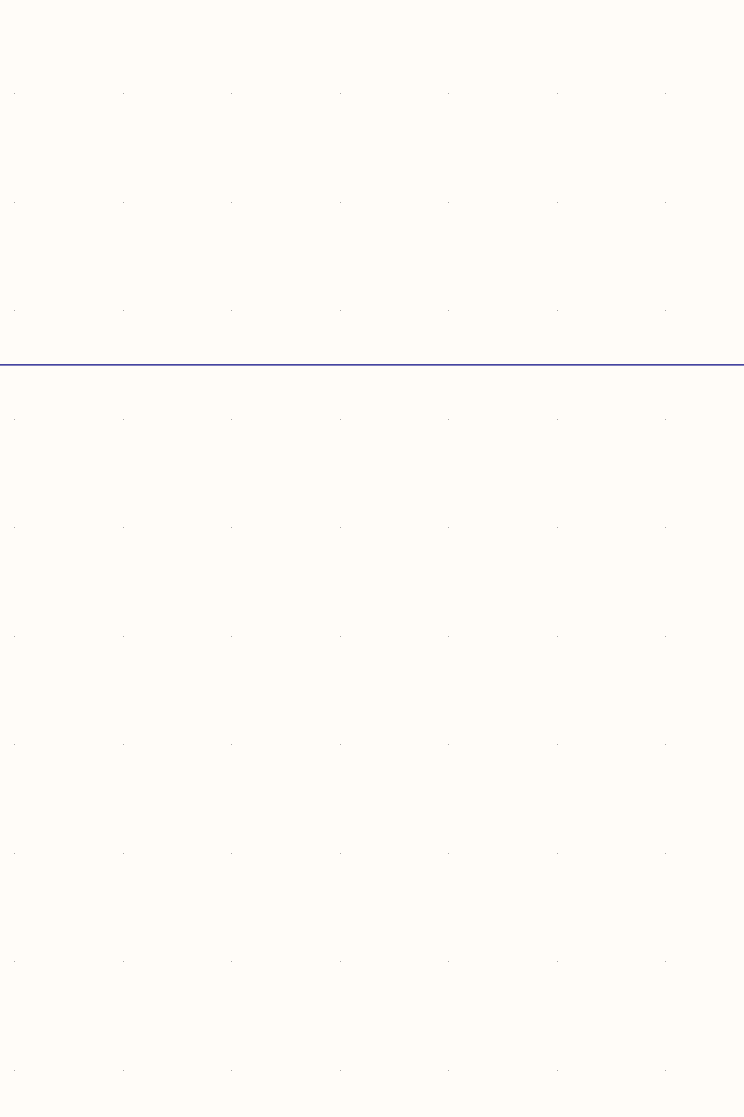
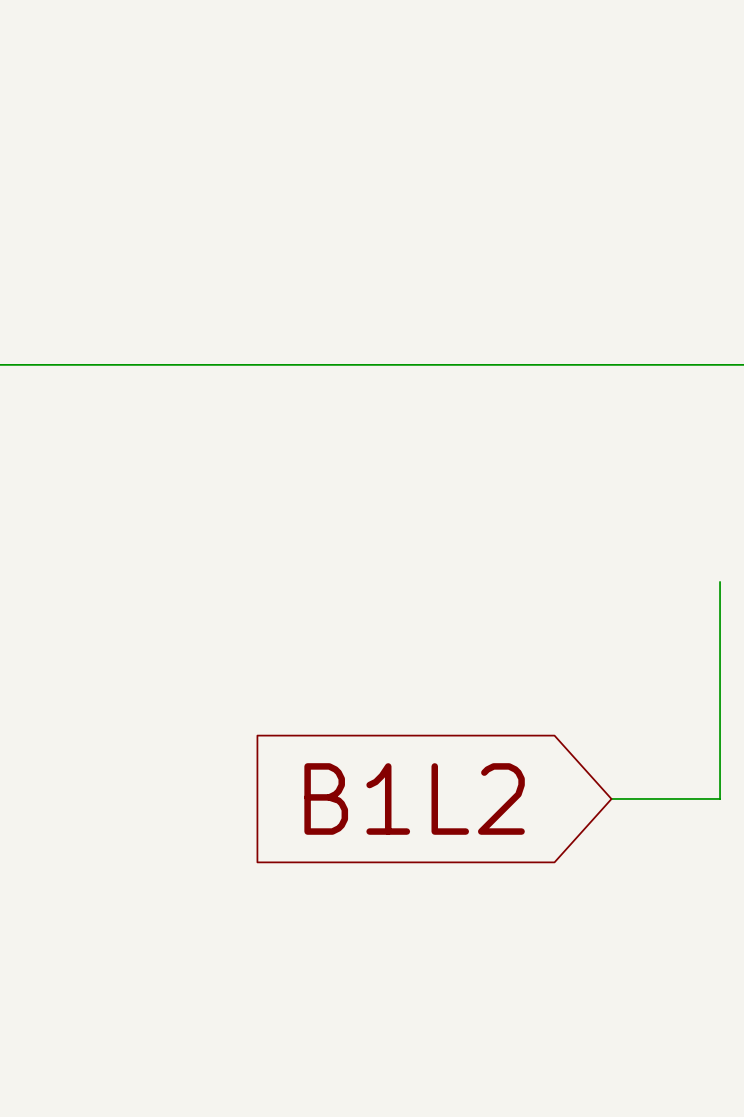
wire: none -> (720, 581) (720, 798) (611, 798)
global label: none -> B1L2 (414, 798)

